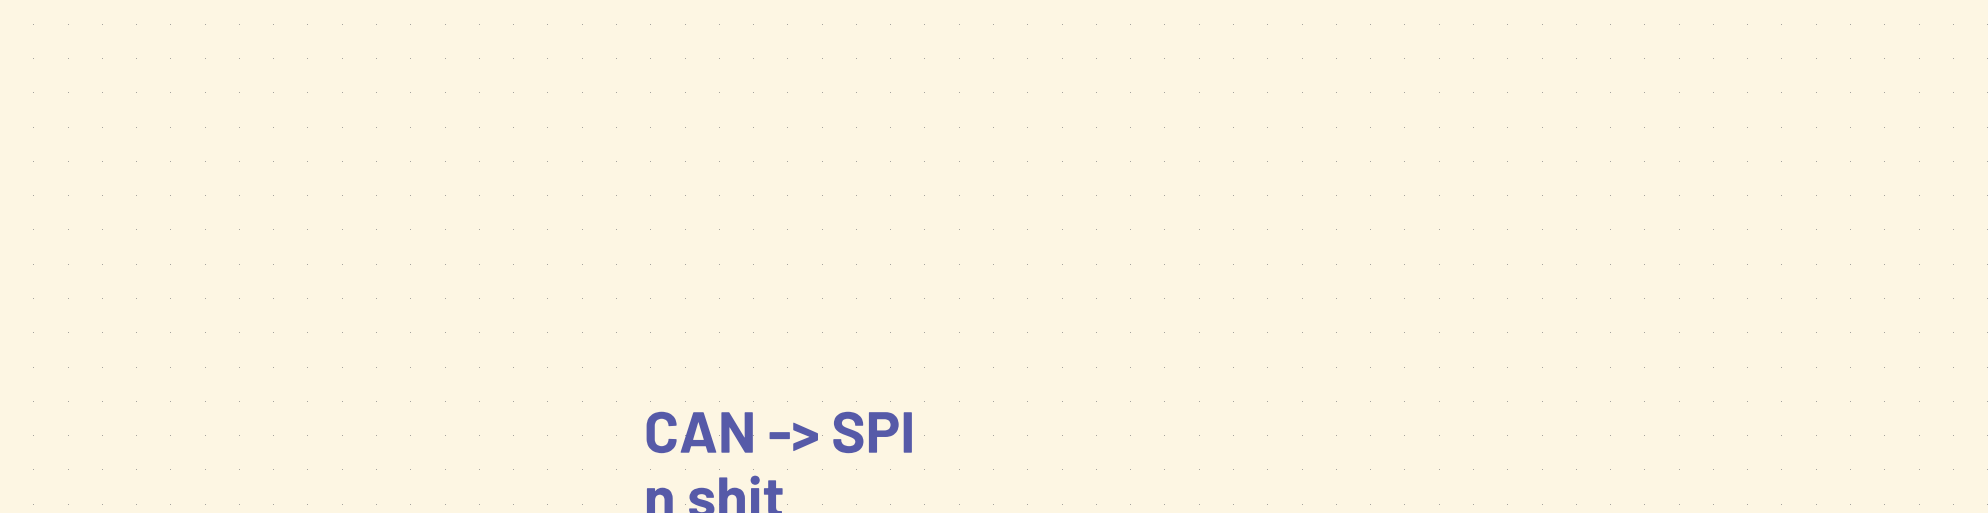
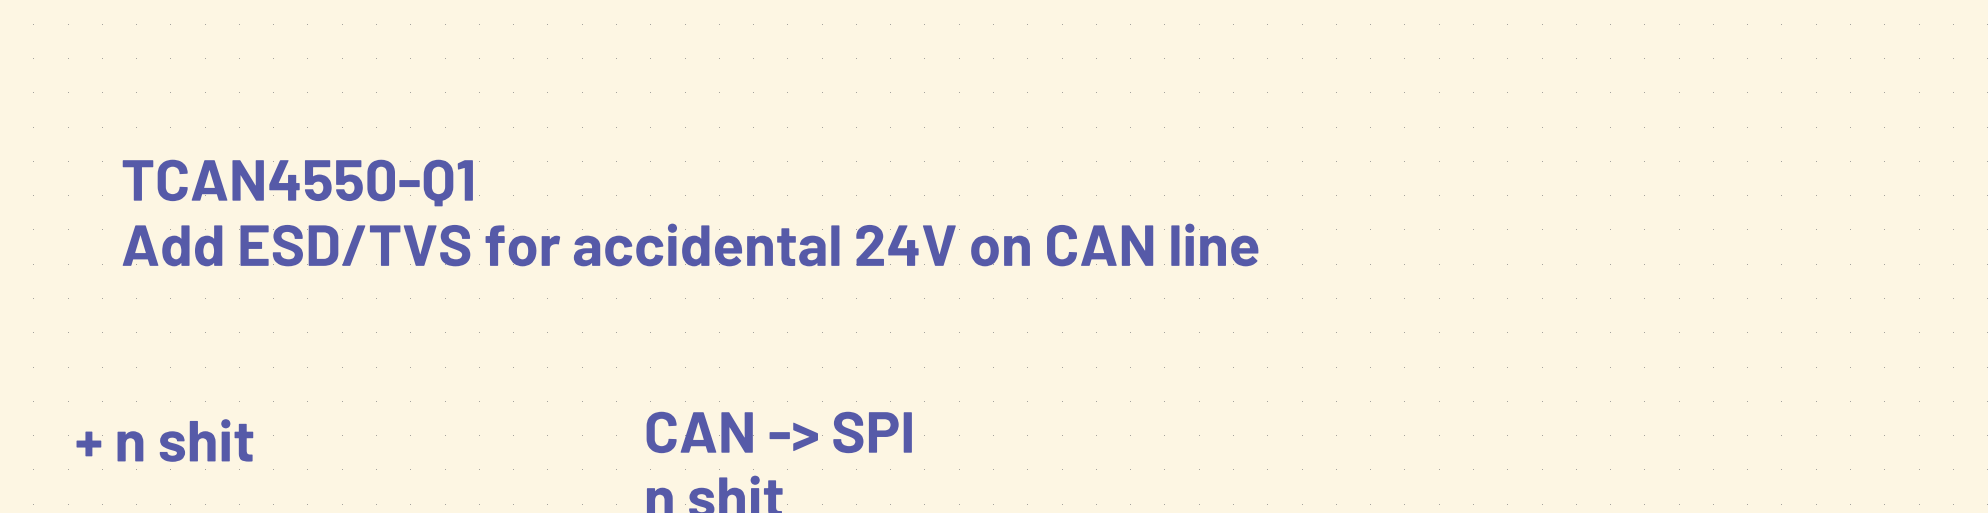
text: none -> TCAN4550-Q1 (297, 183)
text: none -> Add ESD/TVS for accidental 24V on CAN line (690, 244)
text: none -> + n shit (164, 440)

